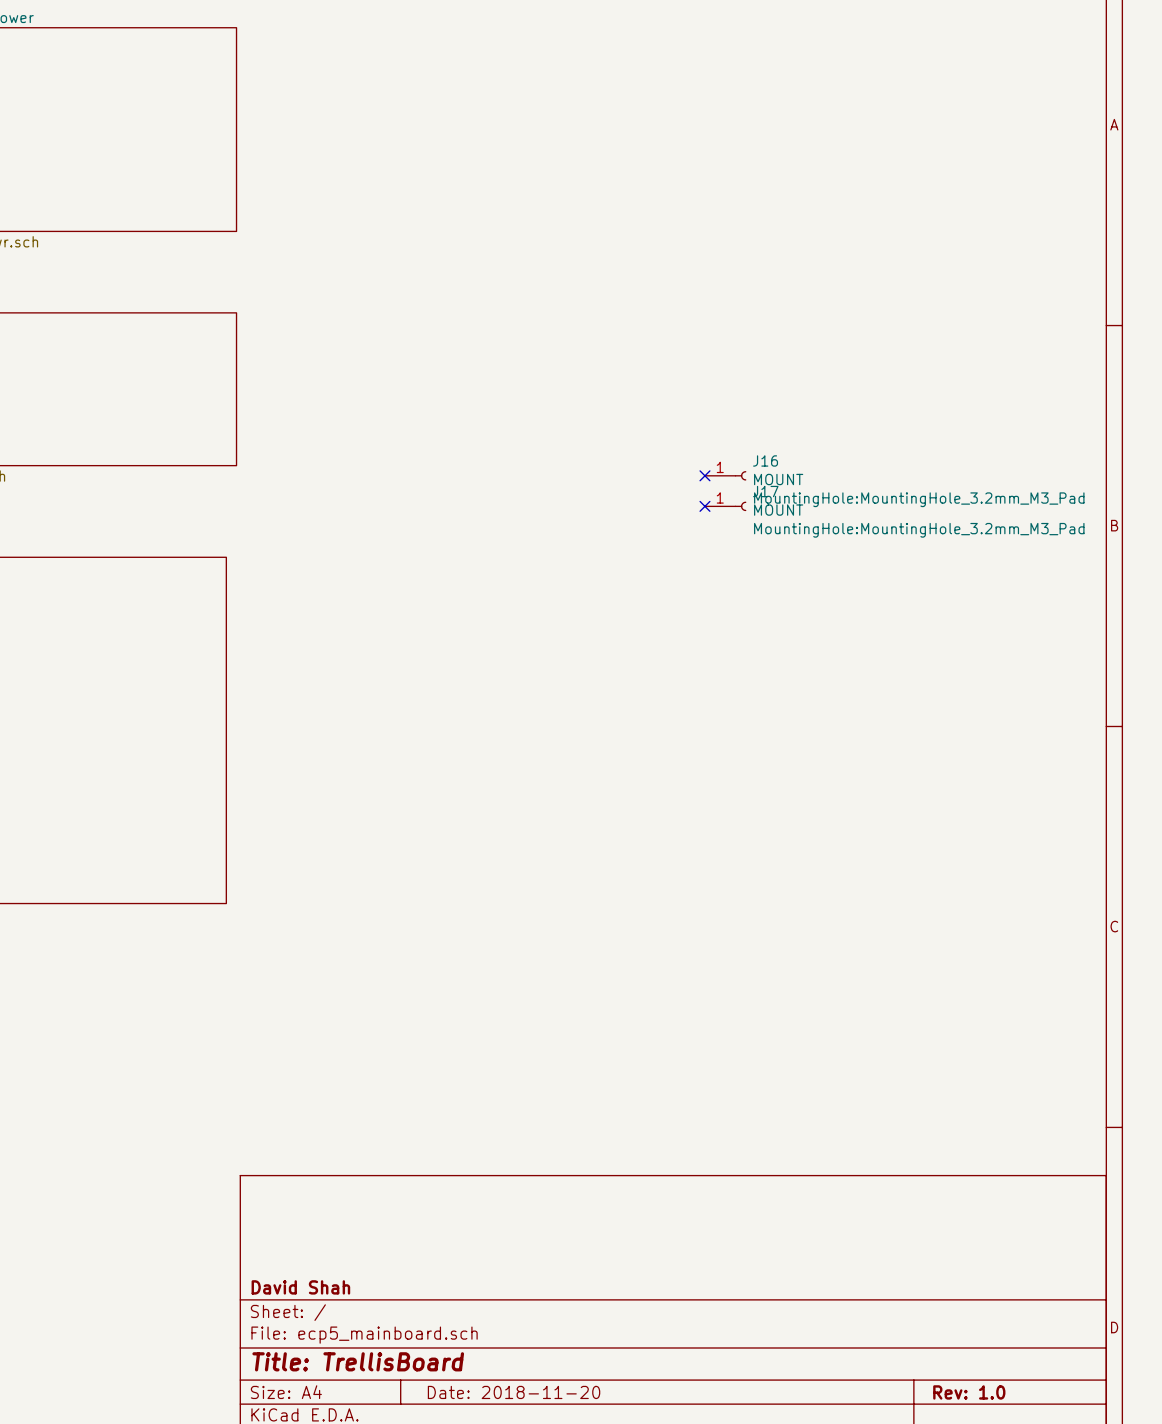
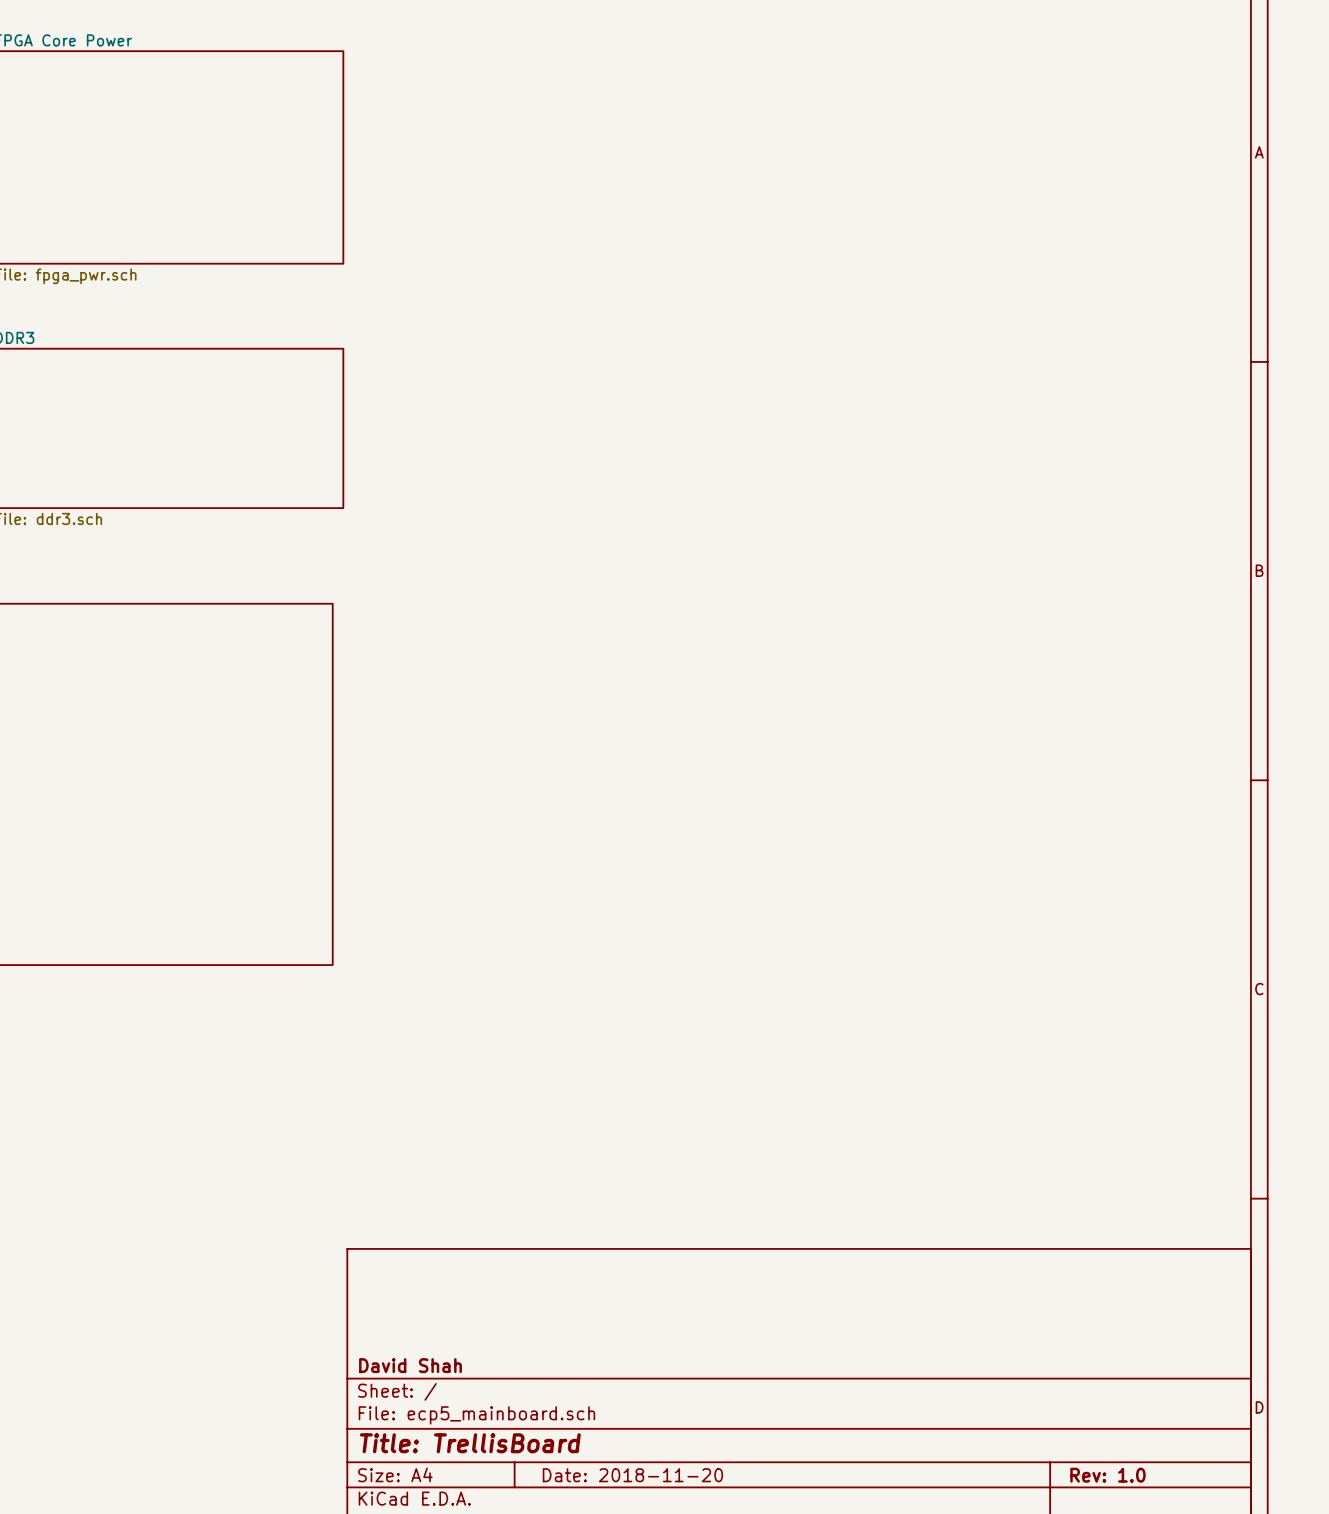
no-connect mark: (704, 475) -> none
J16: MOUNT (725, 475) -> none
no-connect mark: (704, 506) -> none
J17: MOUNT (725, 506) -> none

